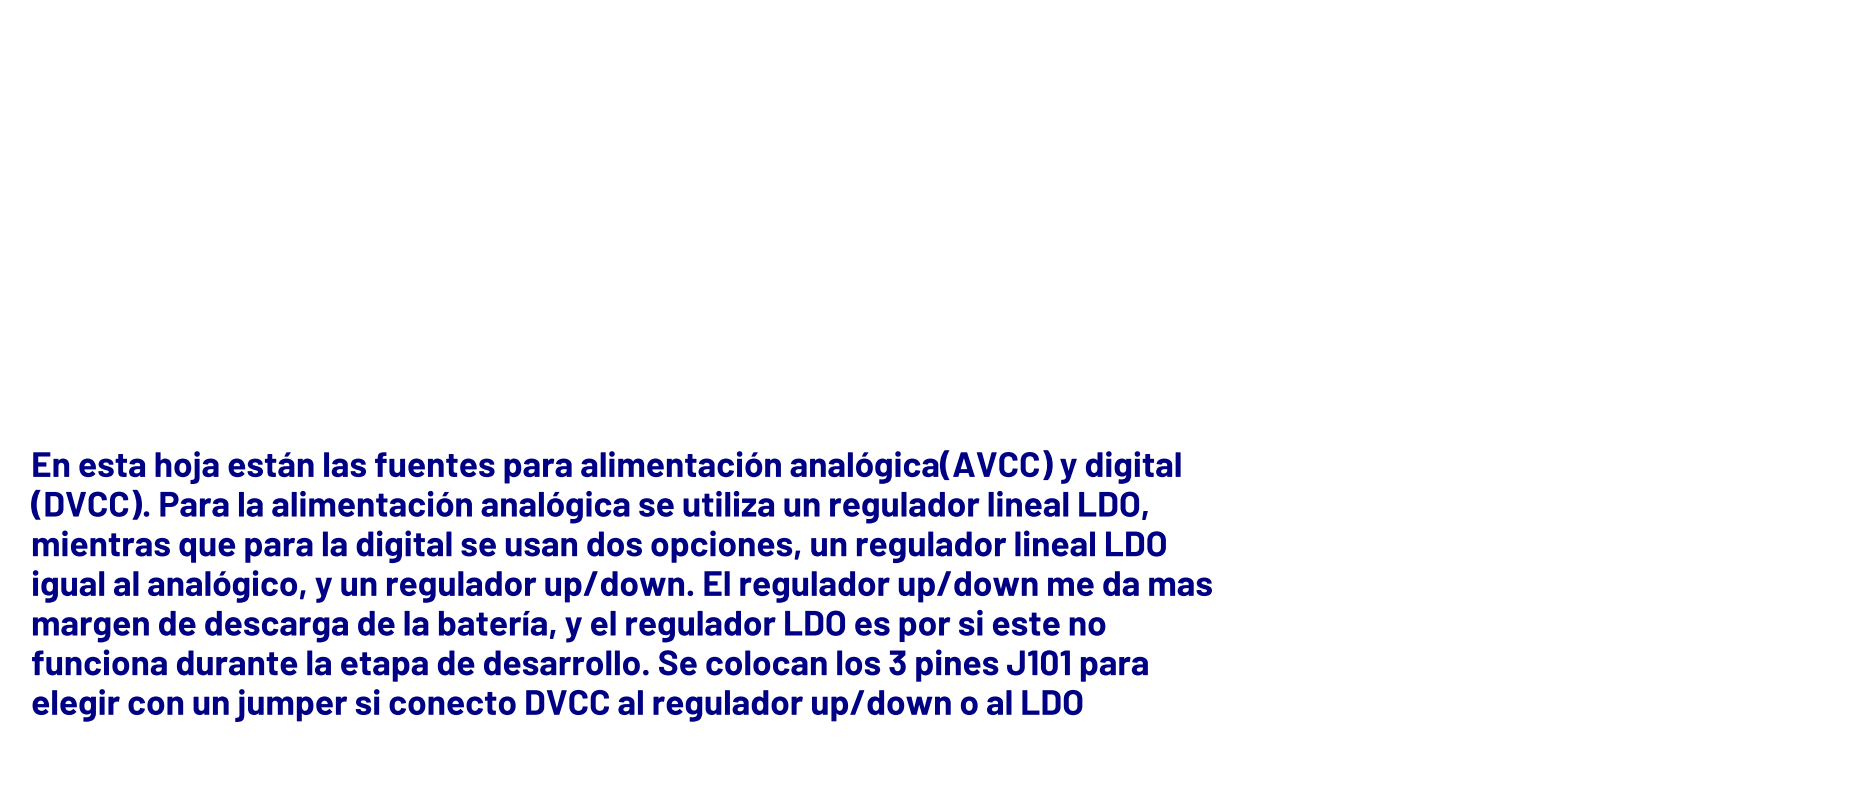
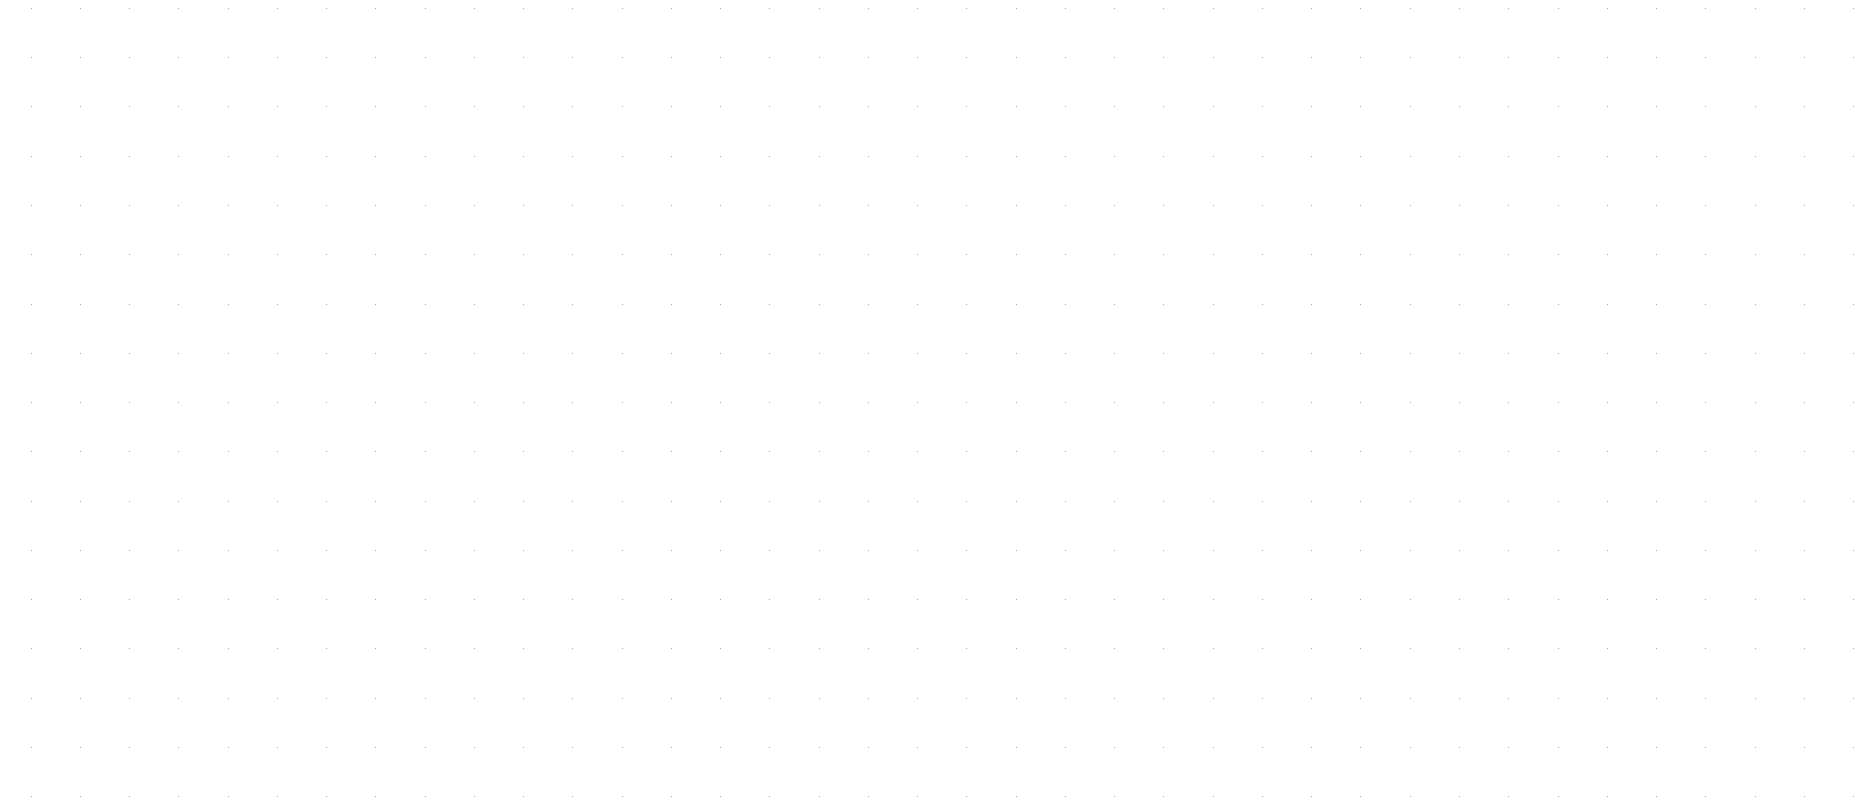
text: En esta hoja están las fuentes para alimentación analógica(AVCC) y digital (606, 467) -> none
text: (DVCC). Para la alimentación analógica se utiliza un regulador lineal LDO, (589, 506) -> none
text: mientras que para la digital se usan dos opciones, un regulador lineal LDO (599, 546) -> none
text: igual al analógico, y un regulador up/down. El regulador up/down me da mas (622, 586) -> none
text: margen de descarga de la batería, y el regulador LDO es por si este no (569, 626) -> none
text: funciona durante la etapa de desarrollo. Se colocan los 3 pines J101 para (589, 665) -> none
text: elegir con un jumper si conecto DVCC al regulador up/down o al LDO (557, 705) -> none

